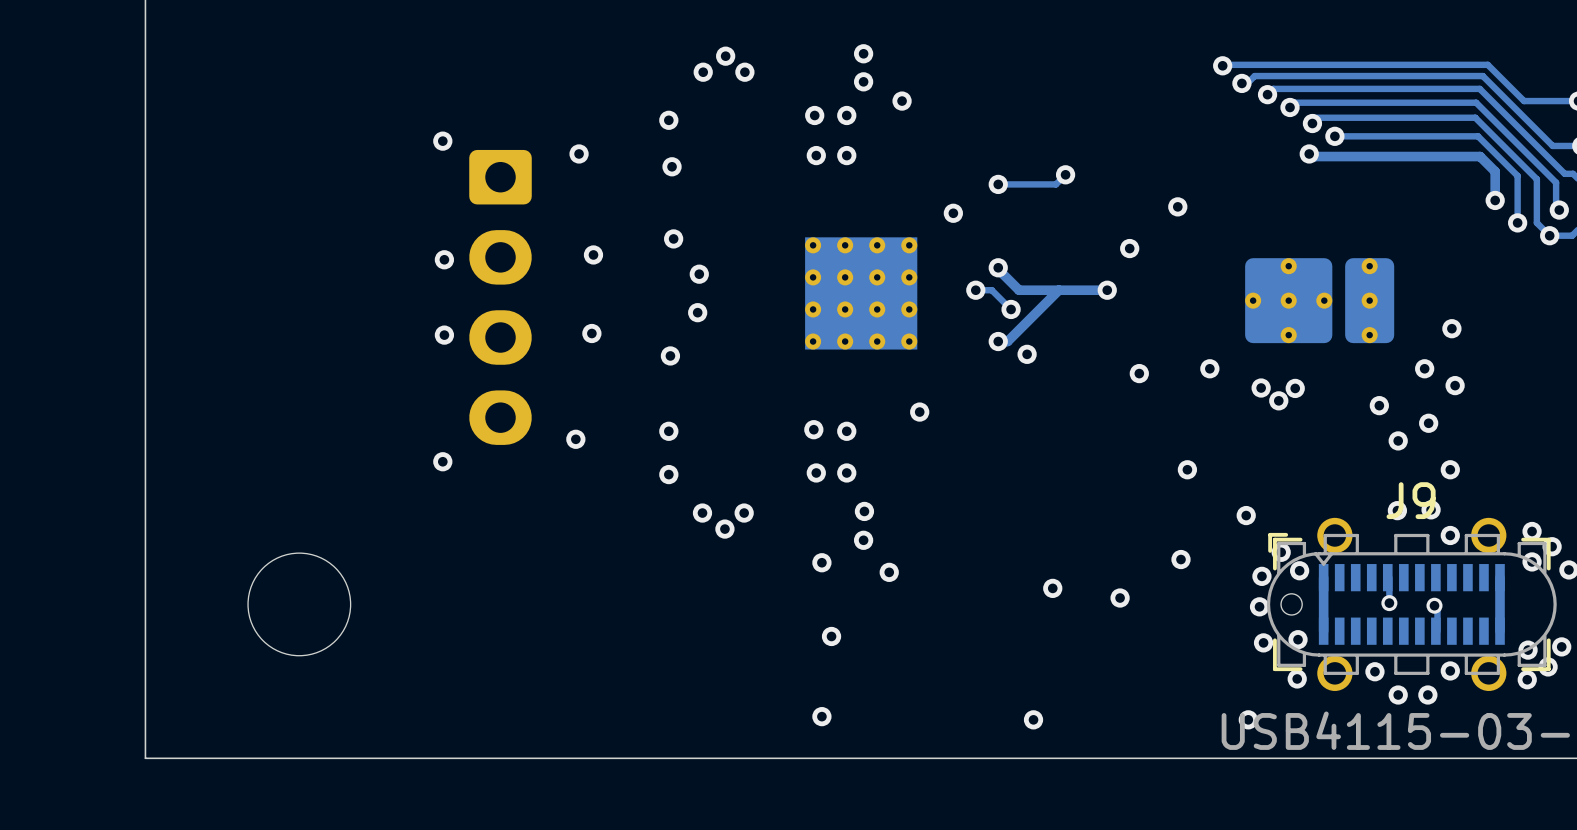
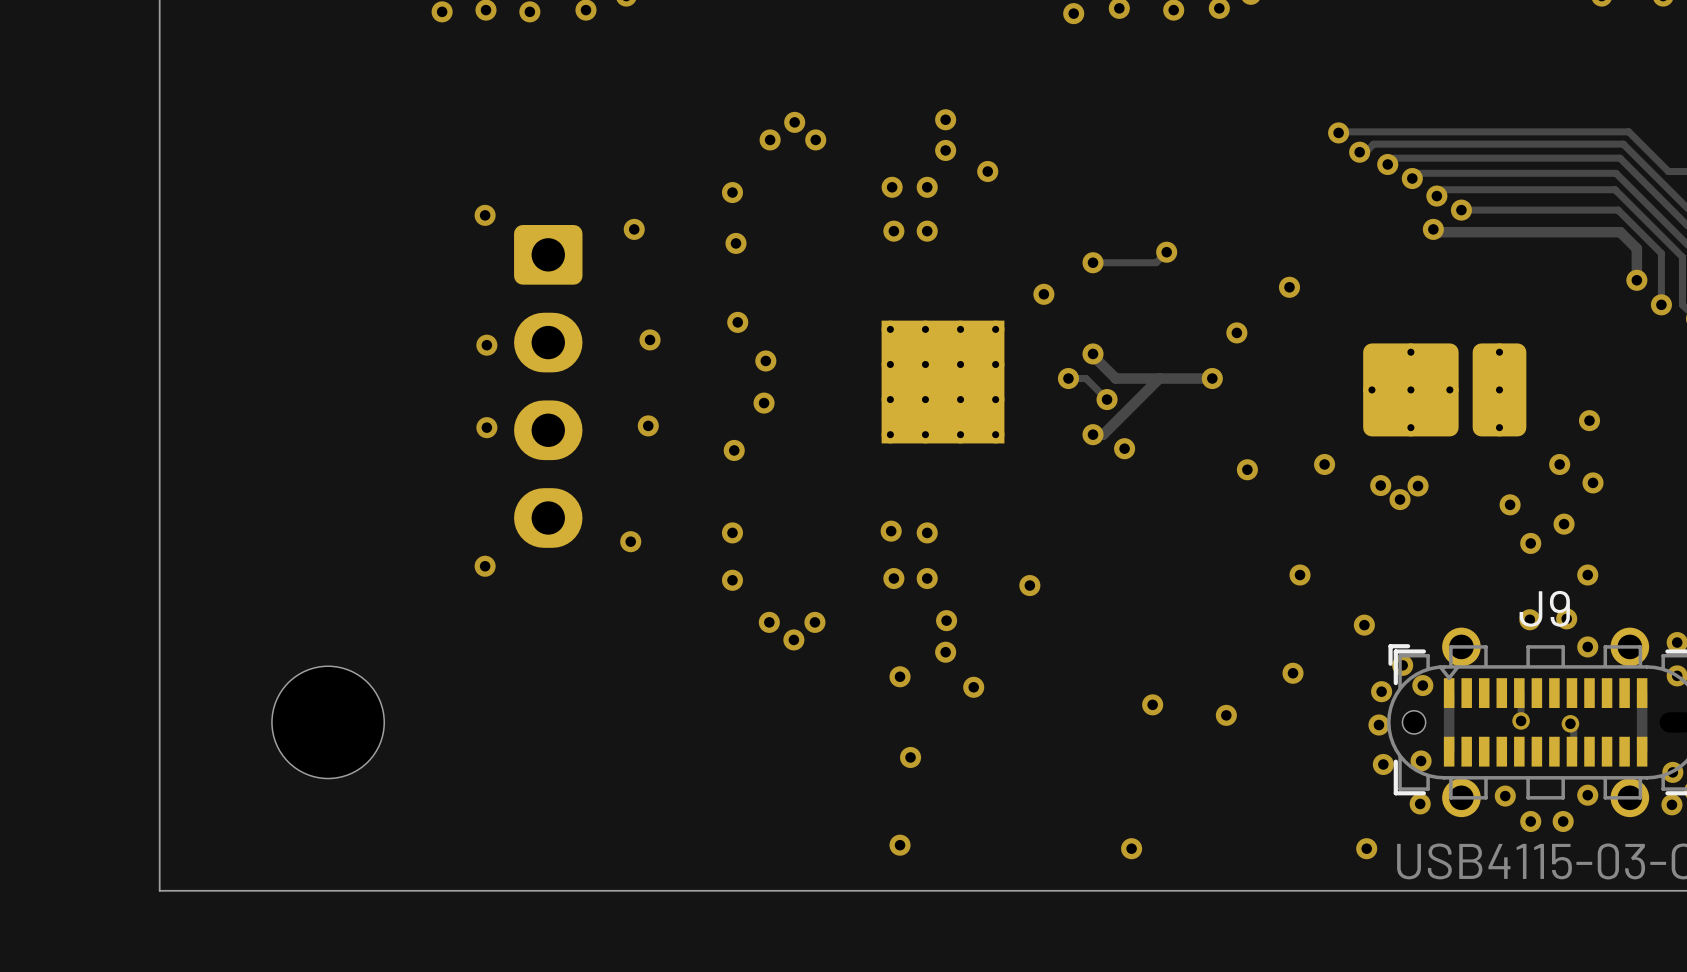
via position: (919, 412) -> (1029, 585)

